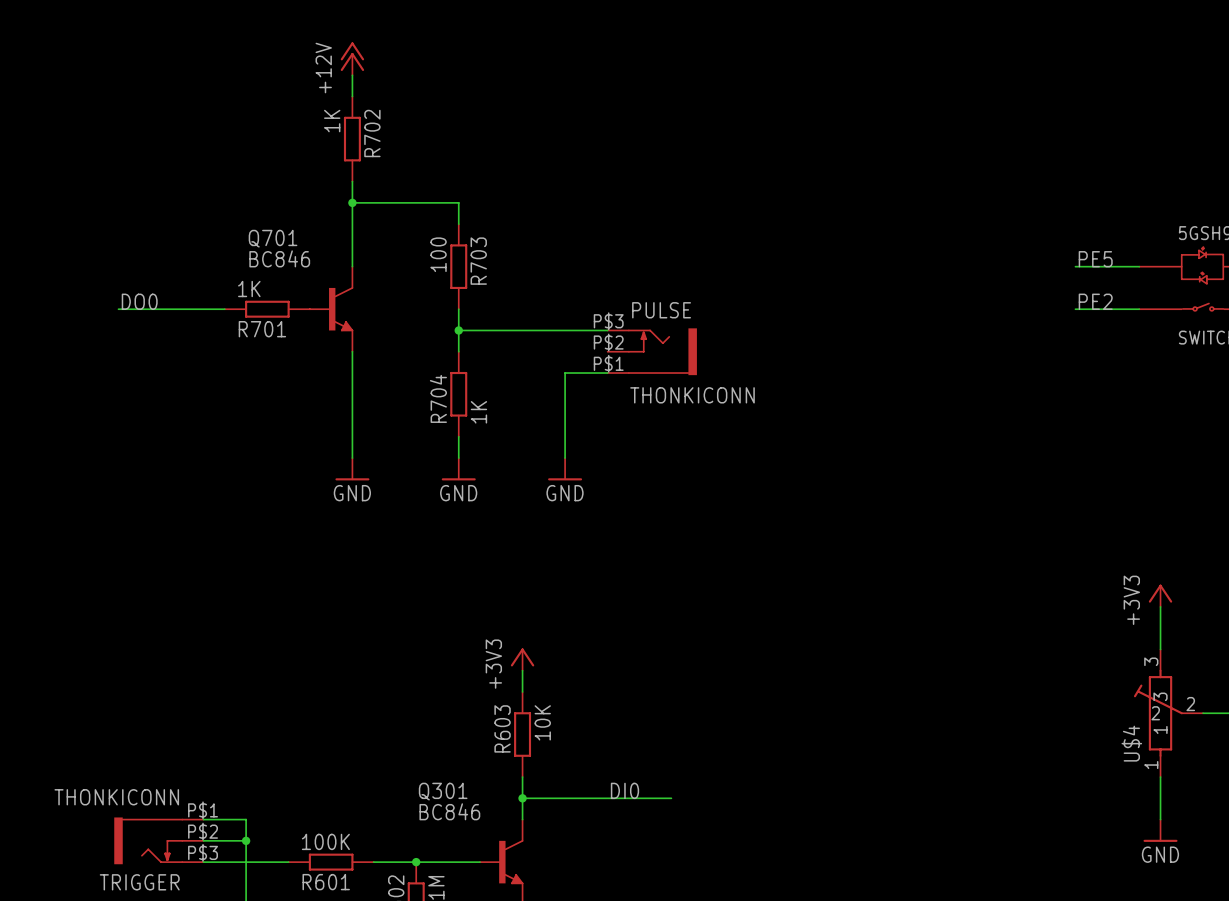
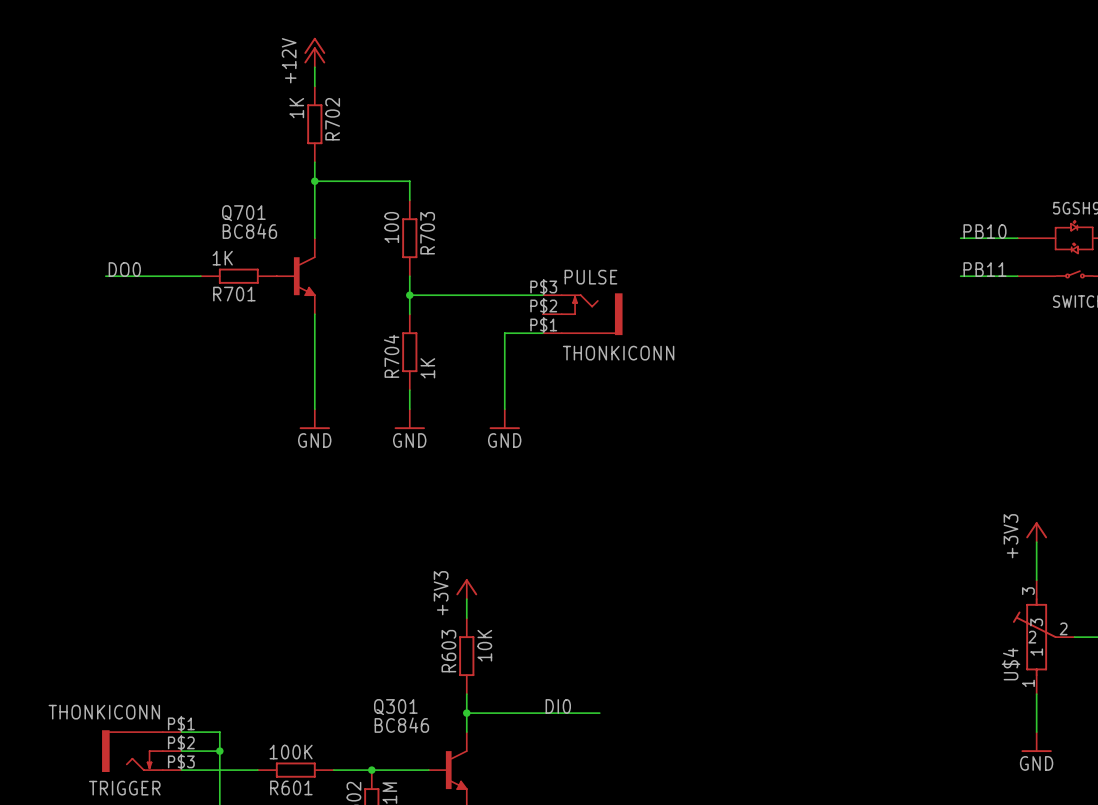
label: PE5 (1095, 259) -> PB10 (985, 231)
label: PE2 (1095, 301) -> PB11 (985, 269)

